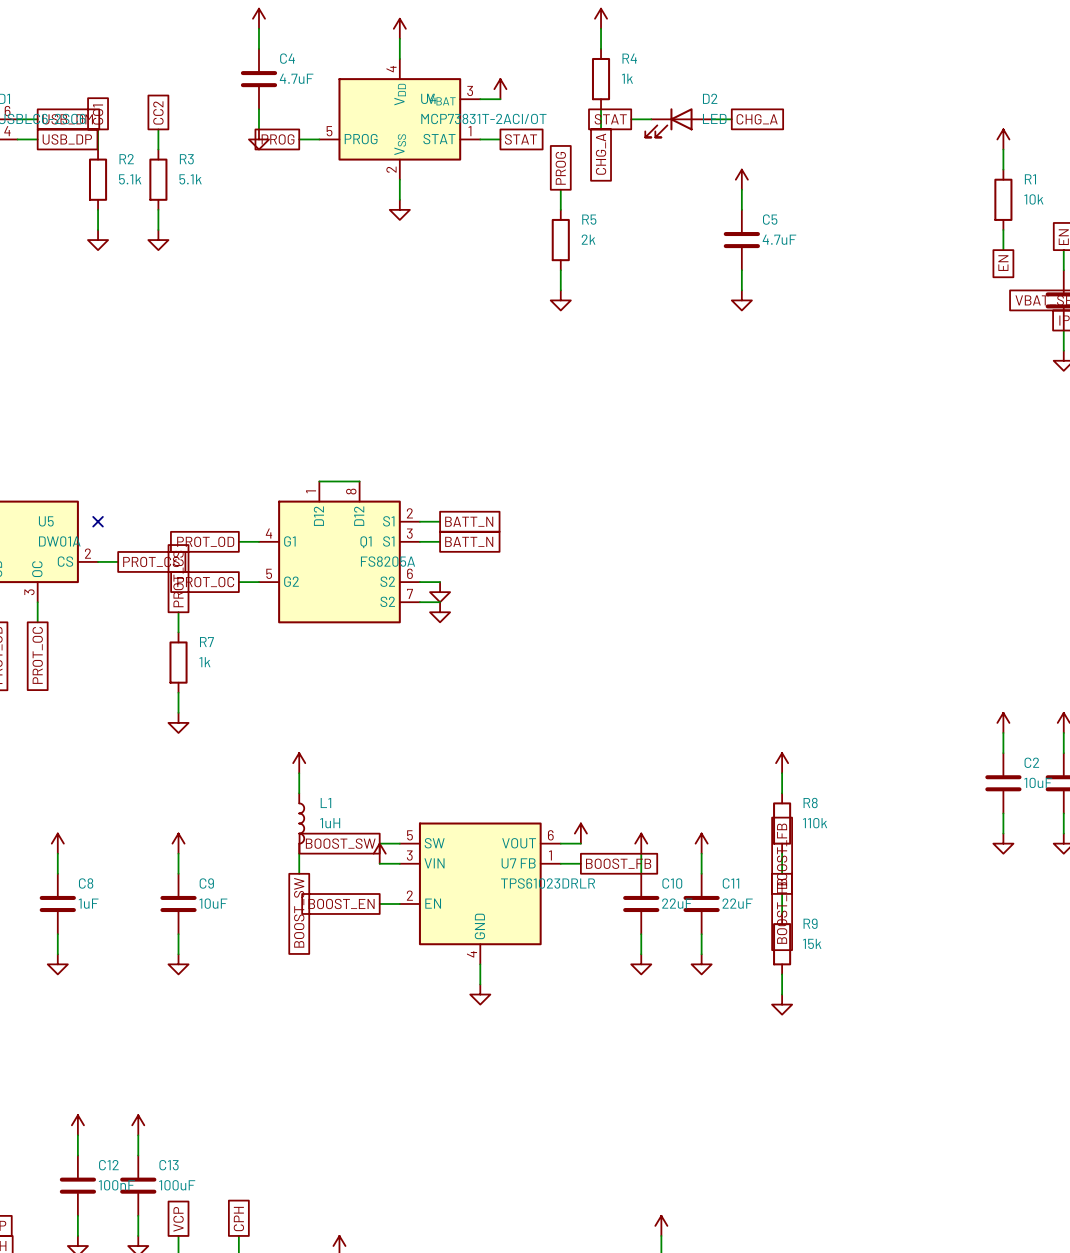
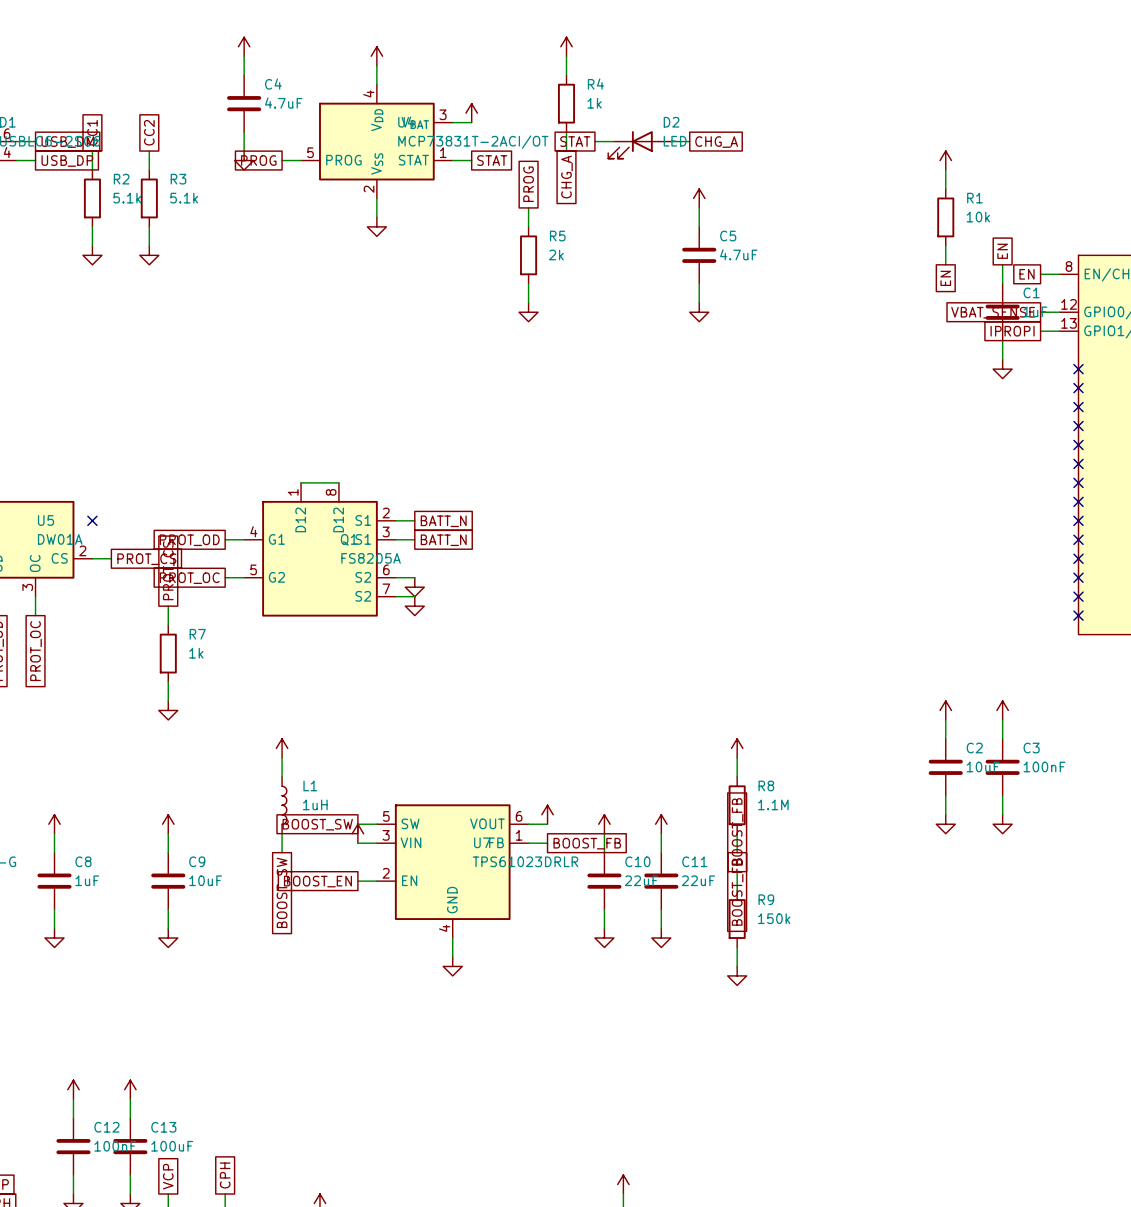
R8 value: 110k (815, 823) -> 1.1M (773, 804)
R9 value: 15k (812, 943) -> 150k (774, 918)

